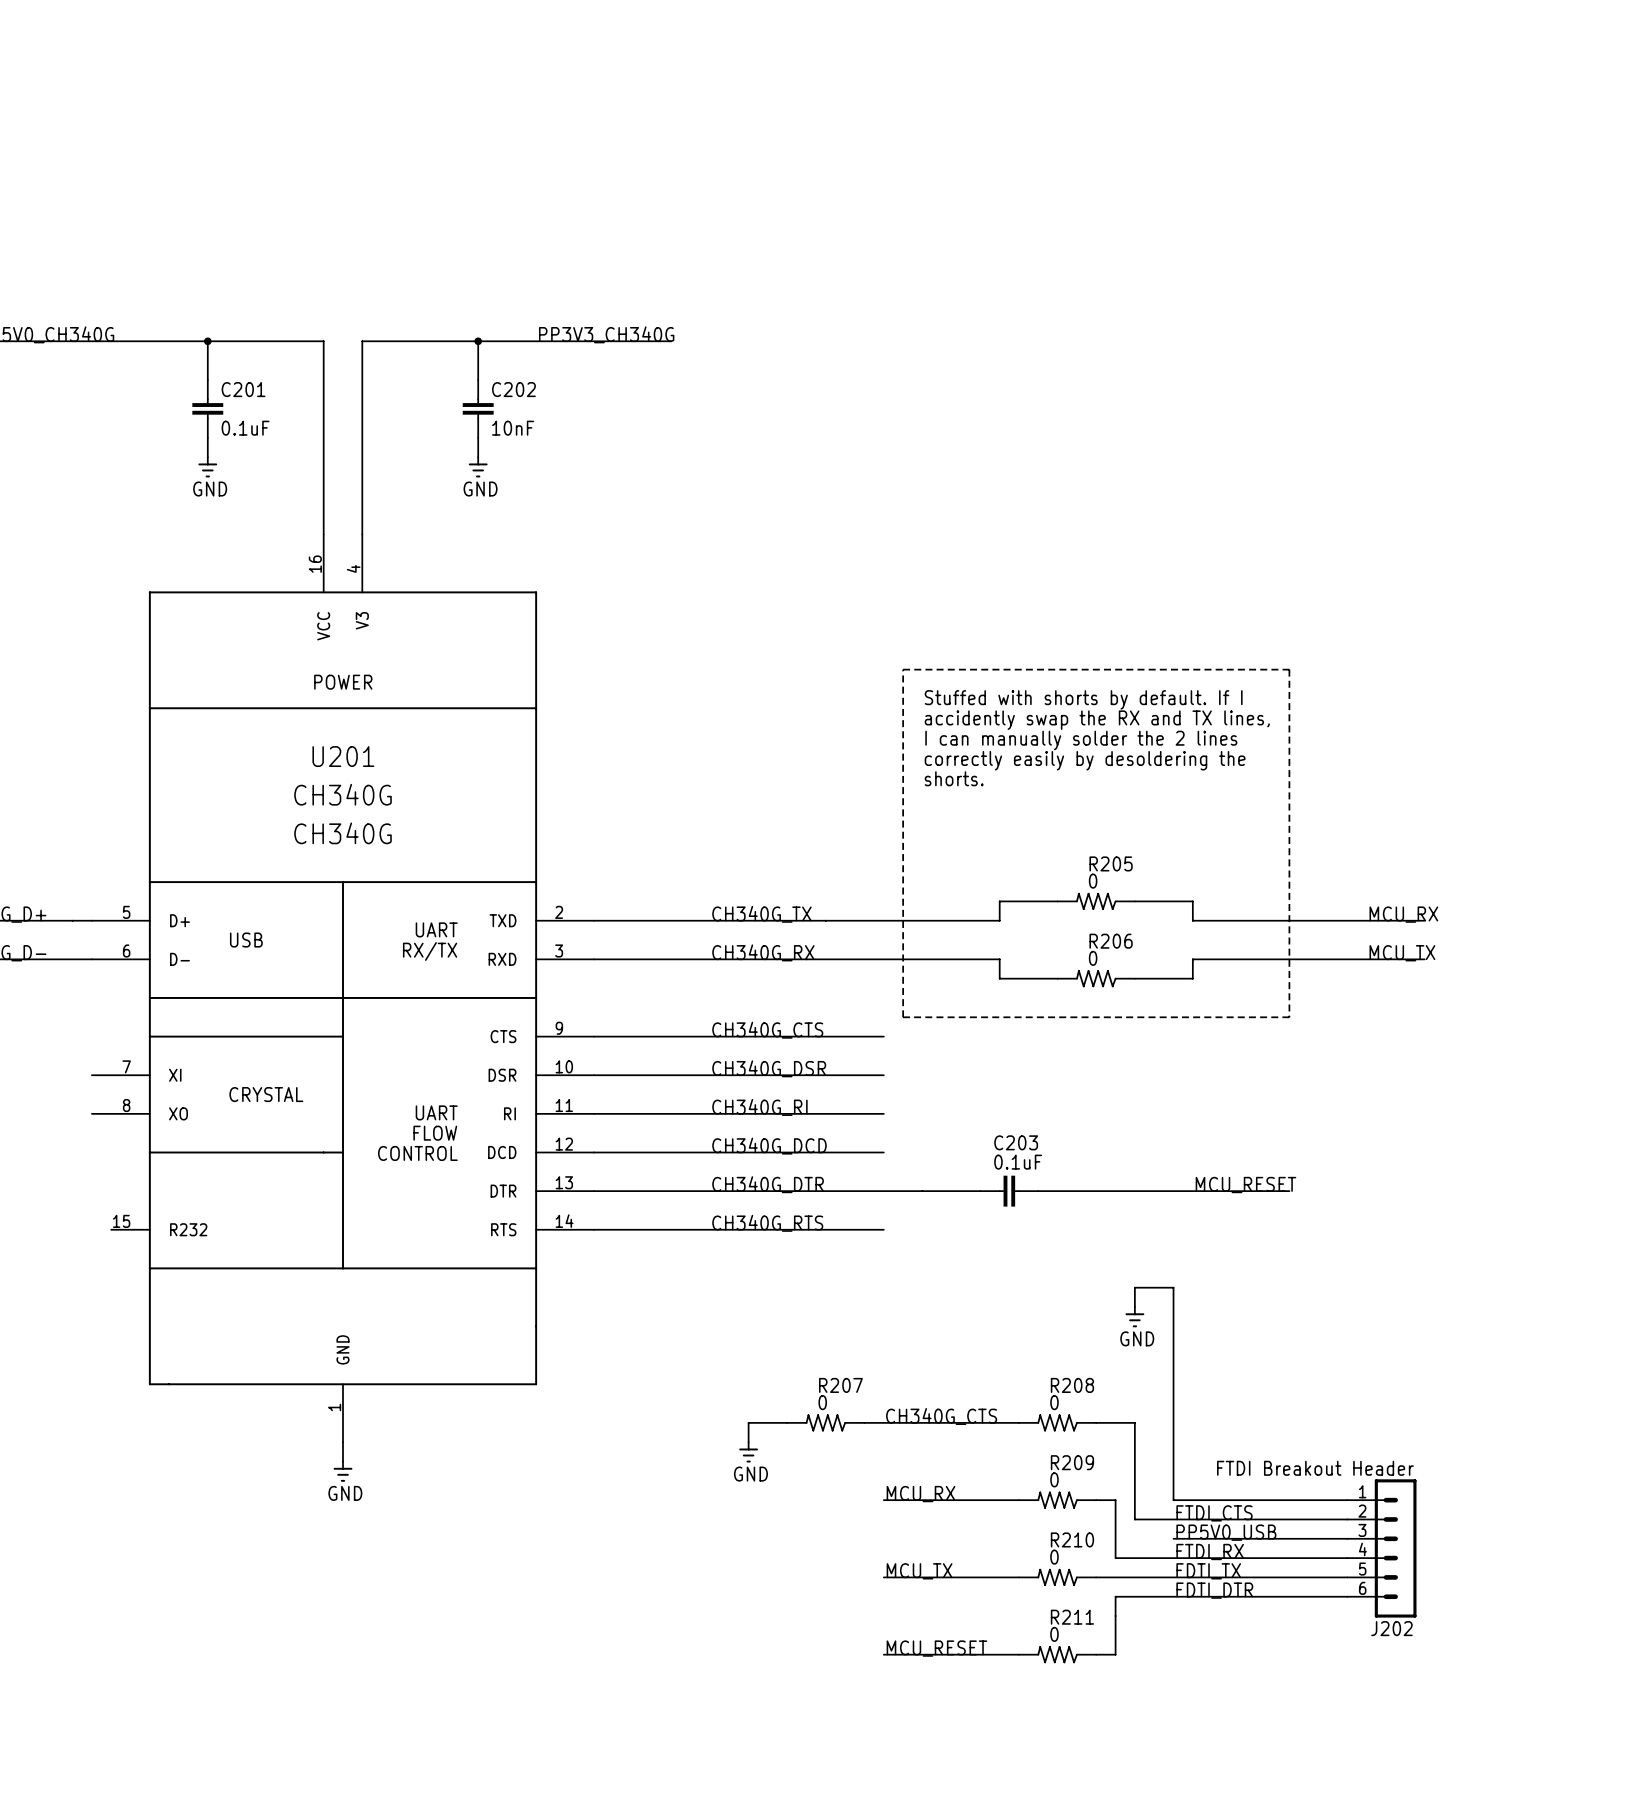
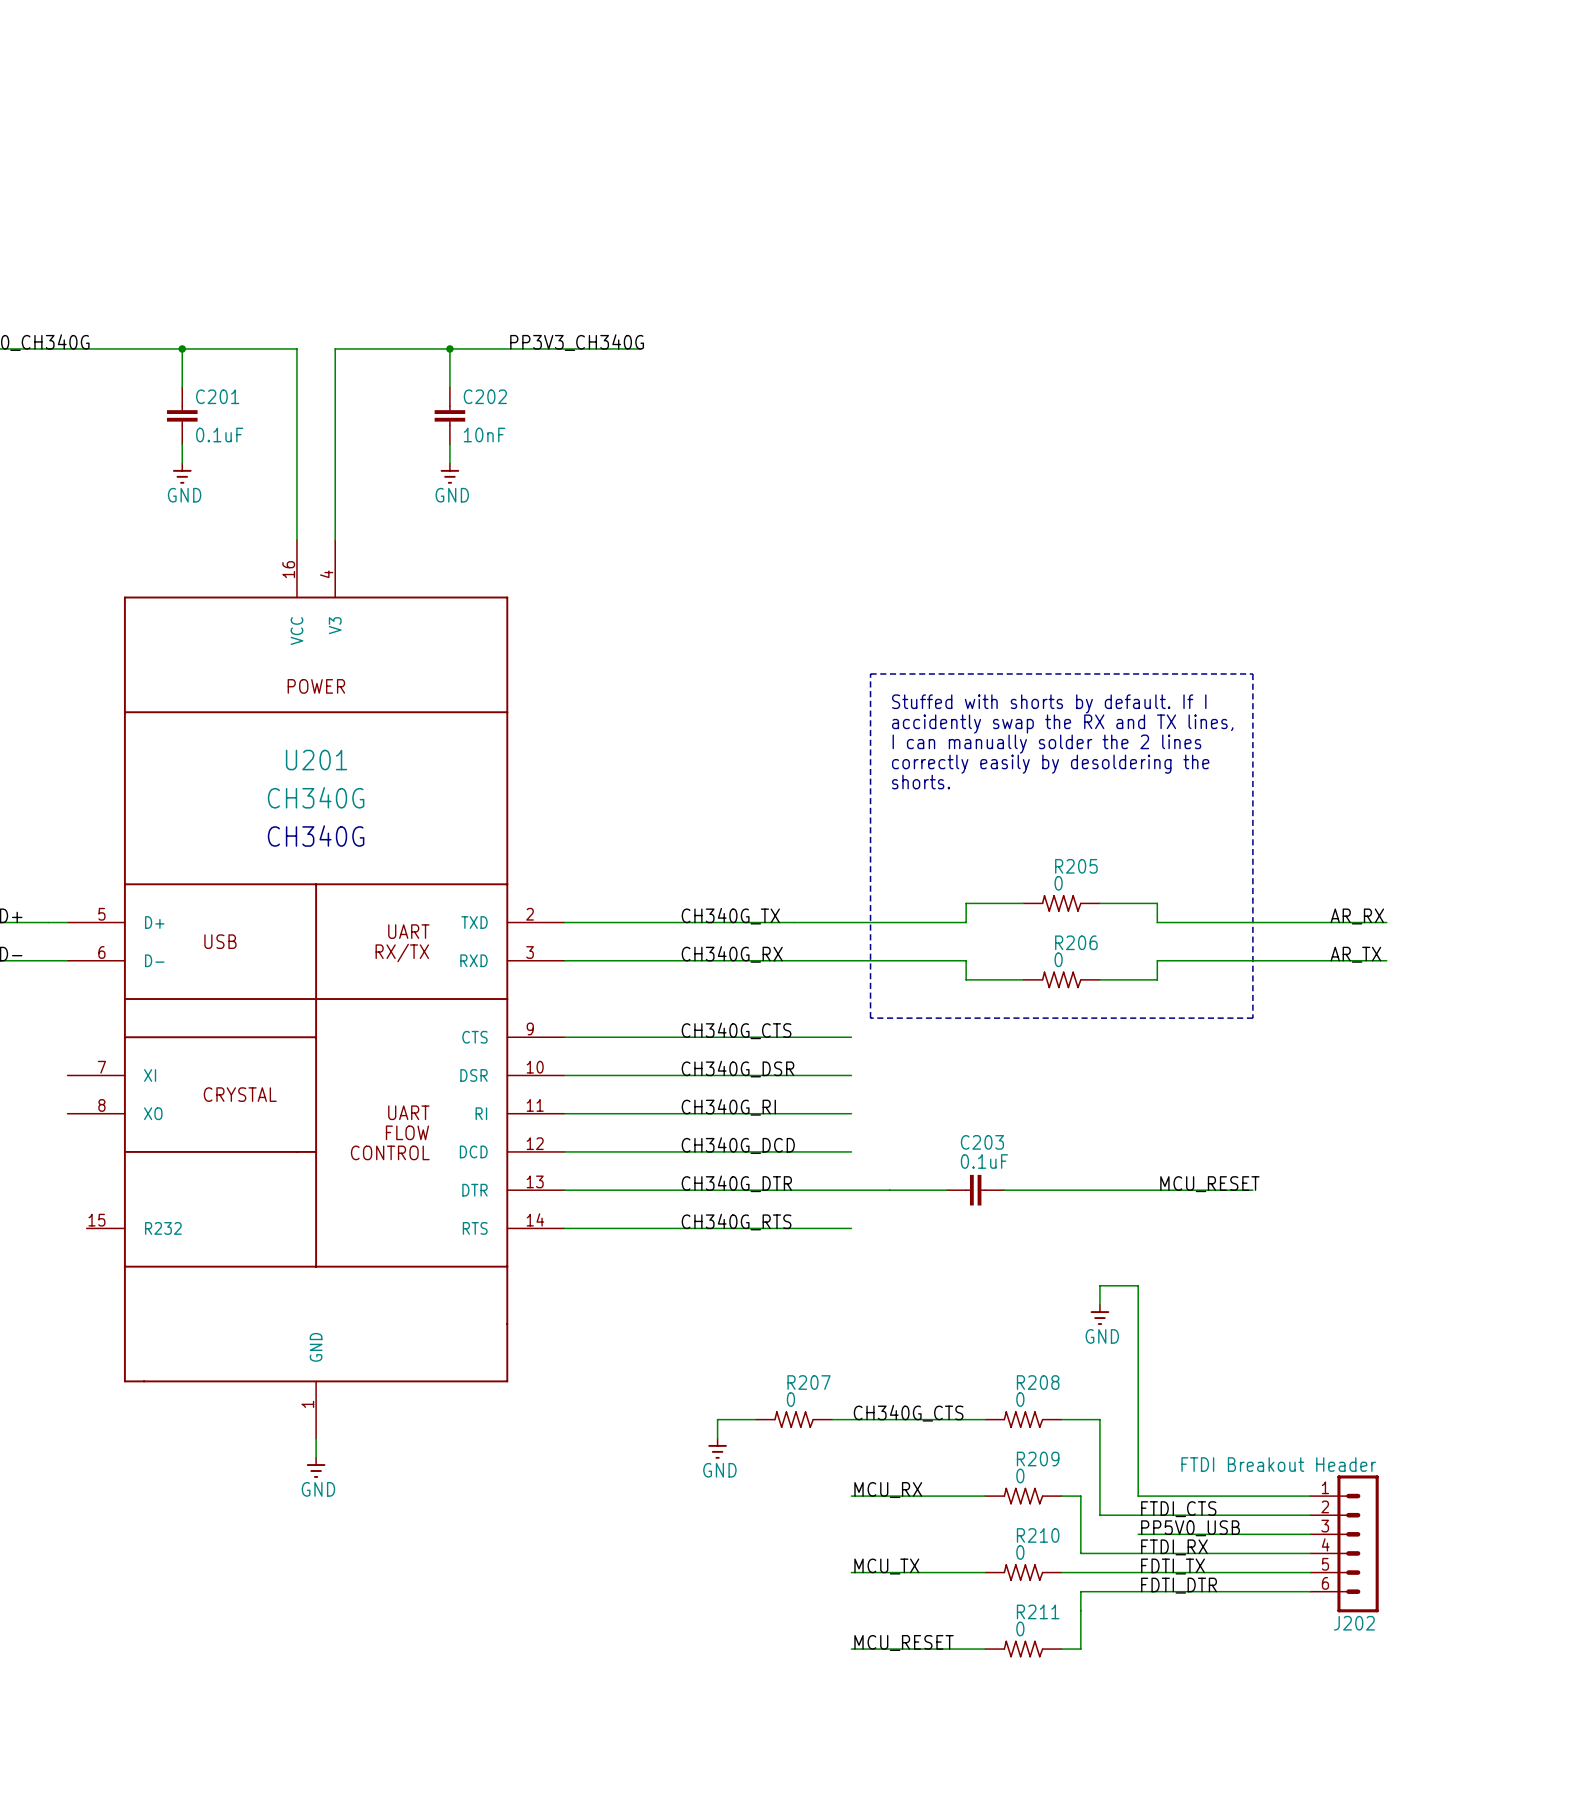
label: MCU_RX (1403, 914) -> AR_RX (1357, 916)
label: MCU_TX (1402, 953) -> AR_TX (1355, 954)

